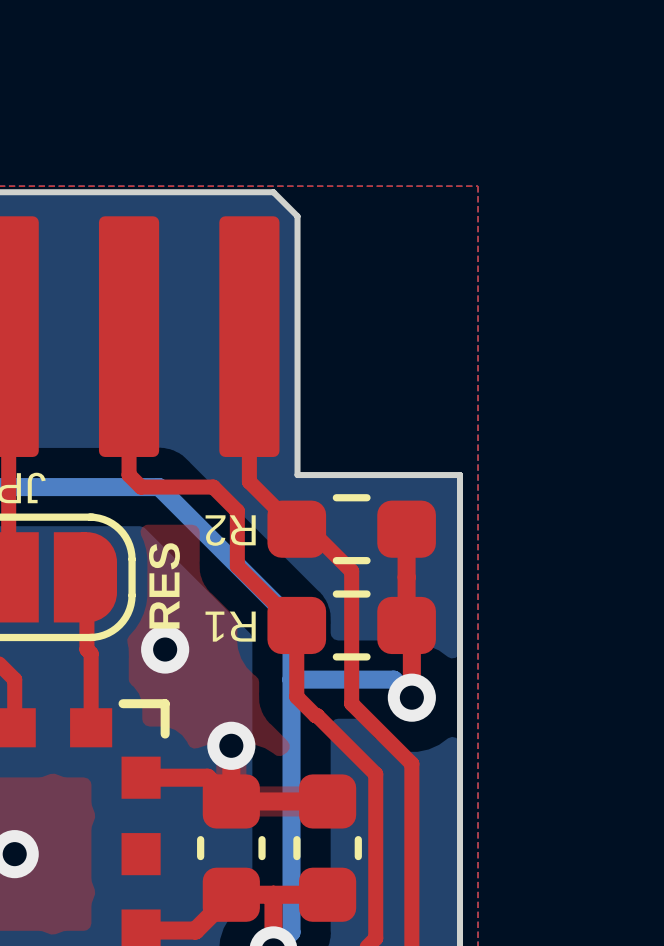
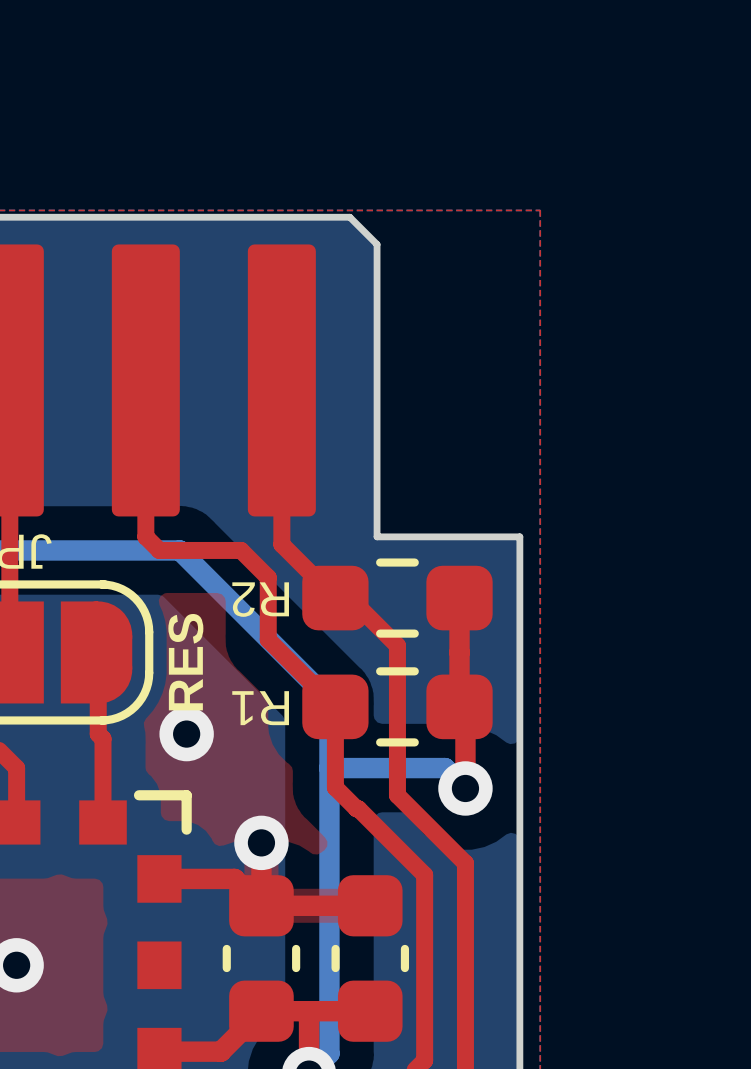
board edge: (273, 192) (297, 216) (297, 475) (333, 475) -> (309, 217) (349, 217) (377, 244) (377, 536)

